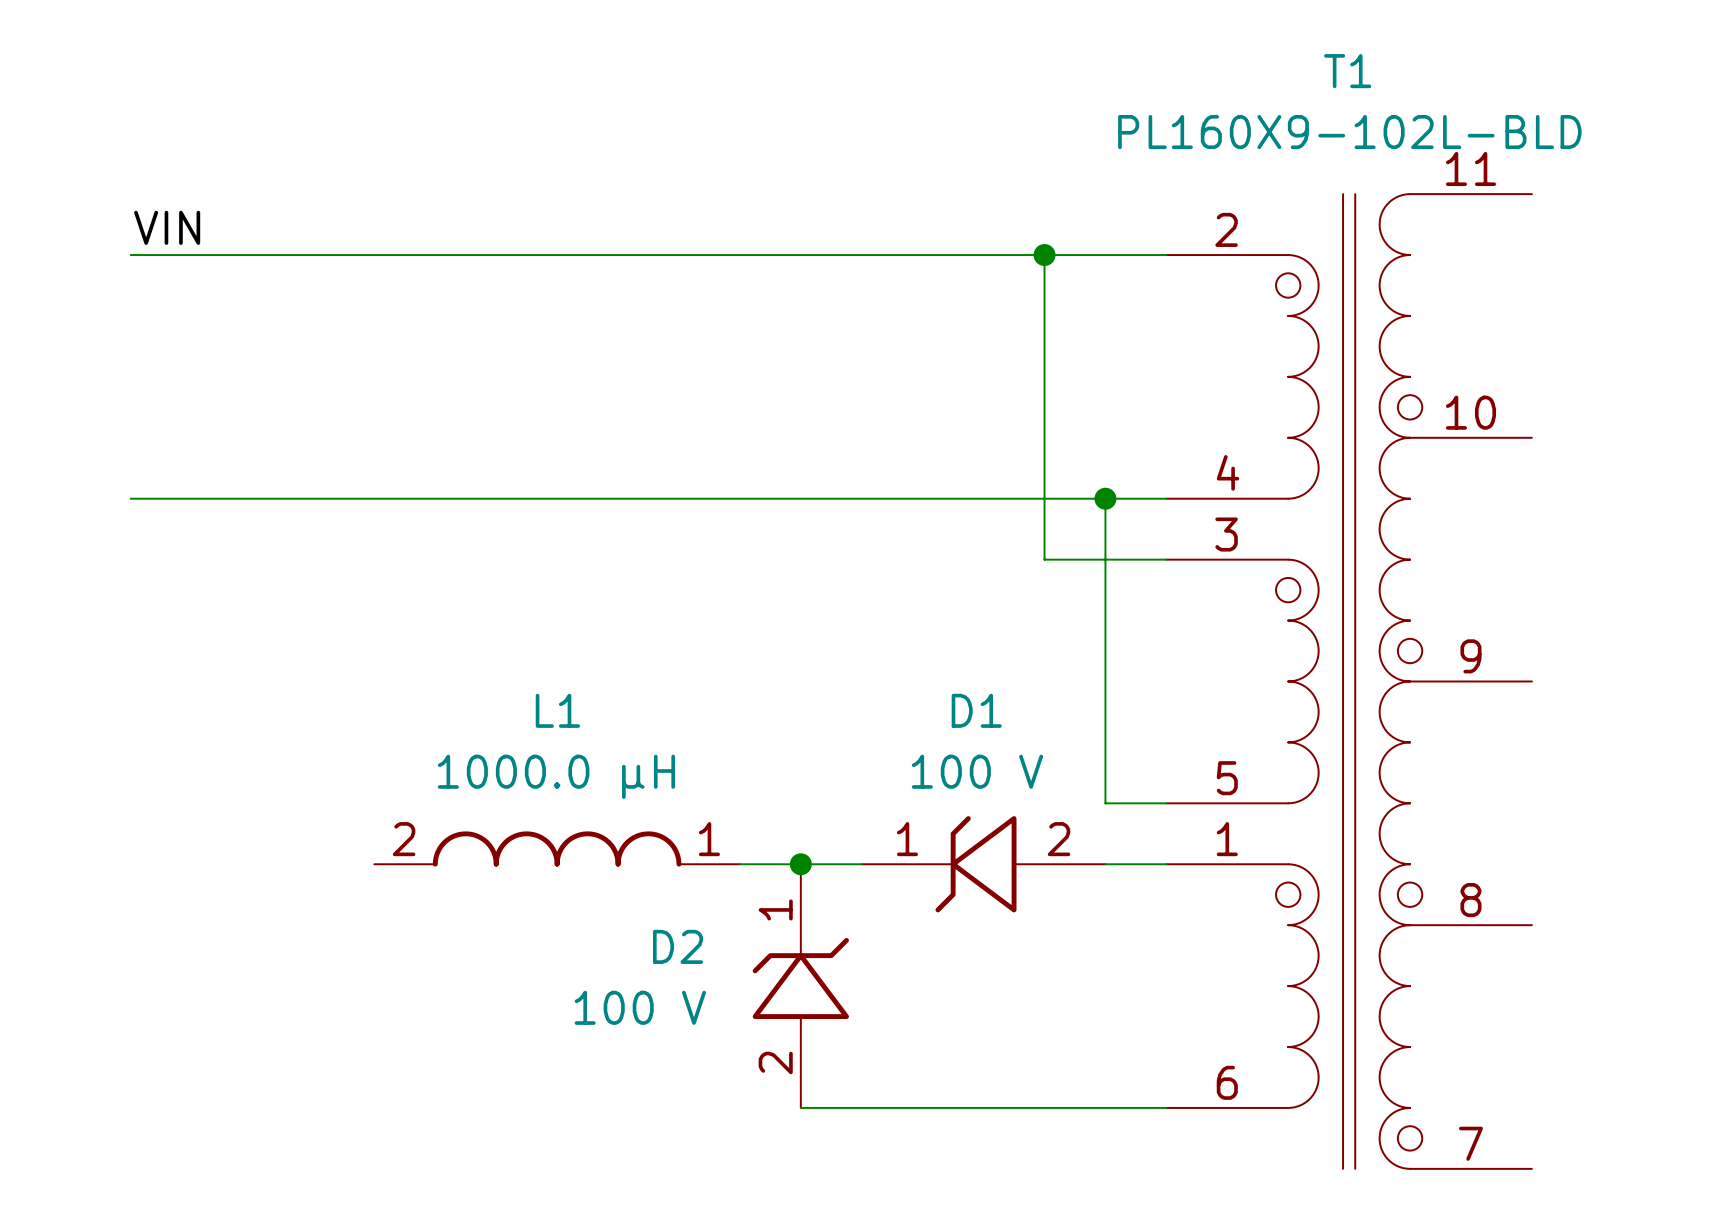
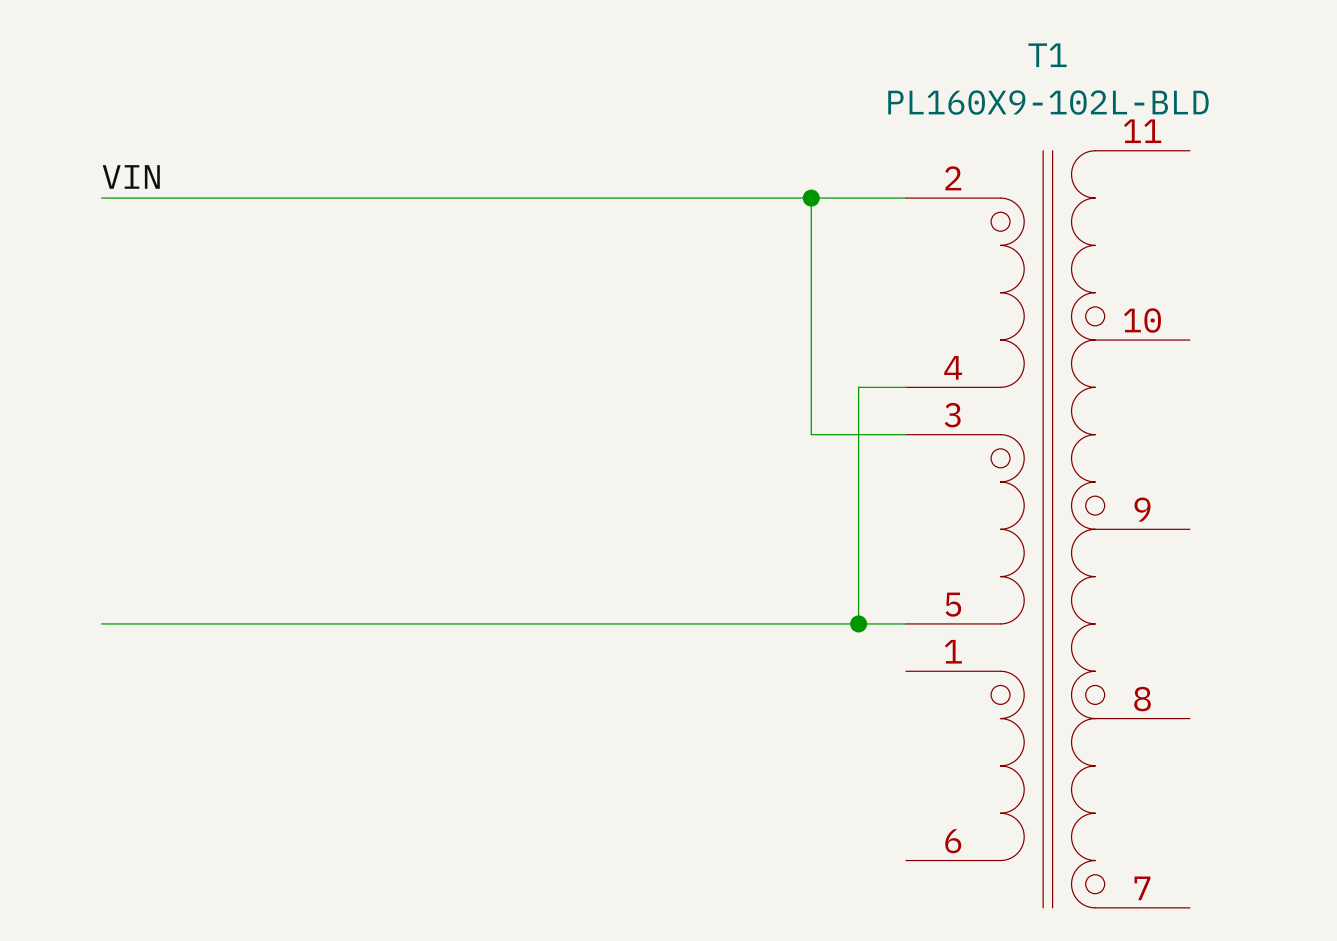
wire: (130, 498) (1105, 498) -> (101, 623) (858, 623)
junction: (1105, 498) -> none
junction: none -> (858, 623)
L1: 1000.0 µH (557, 848) -> none
wire: (739, 864) (861, 864) -> none
junction: (800, 864) -> none
D1: 100 V (983, 864) -> none
wire: (1105, 864) (1166, 864) -> none
D2: 100 V (800, 986) -> none
wire: (800, 1107) (1166, 1107) -> none

